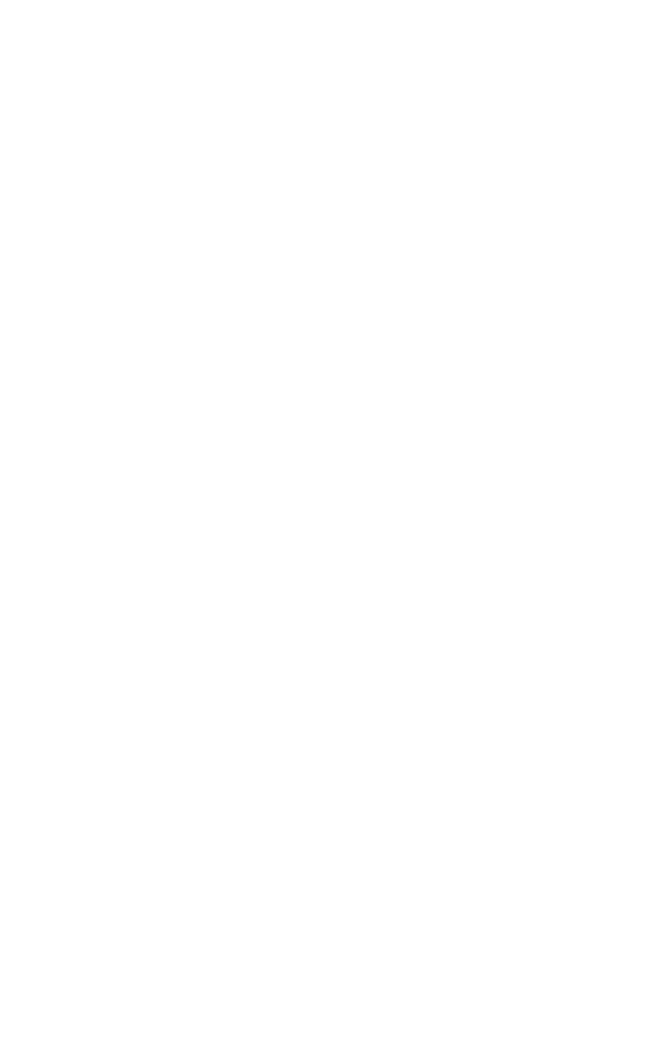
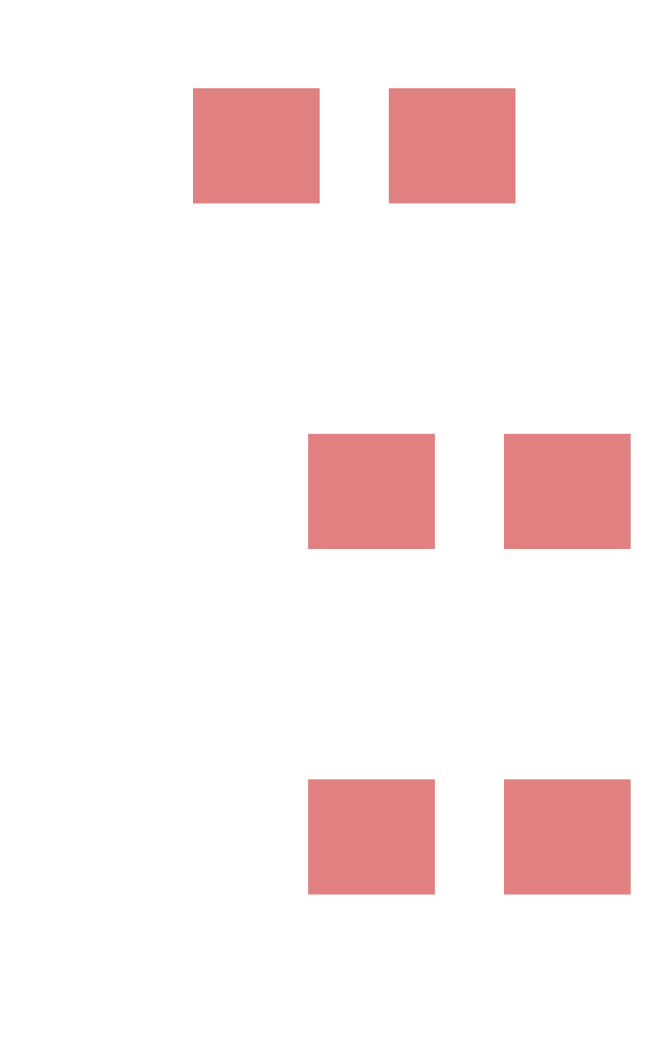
part: none -> (354, 145)
part: none -> (469, 491)
part: none -> (469, 836)

